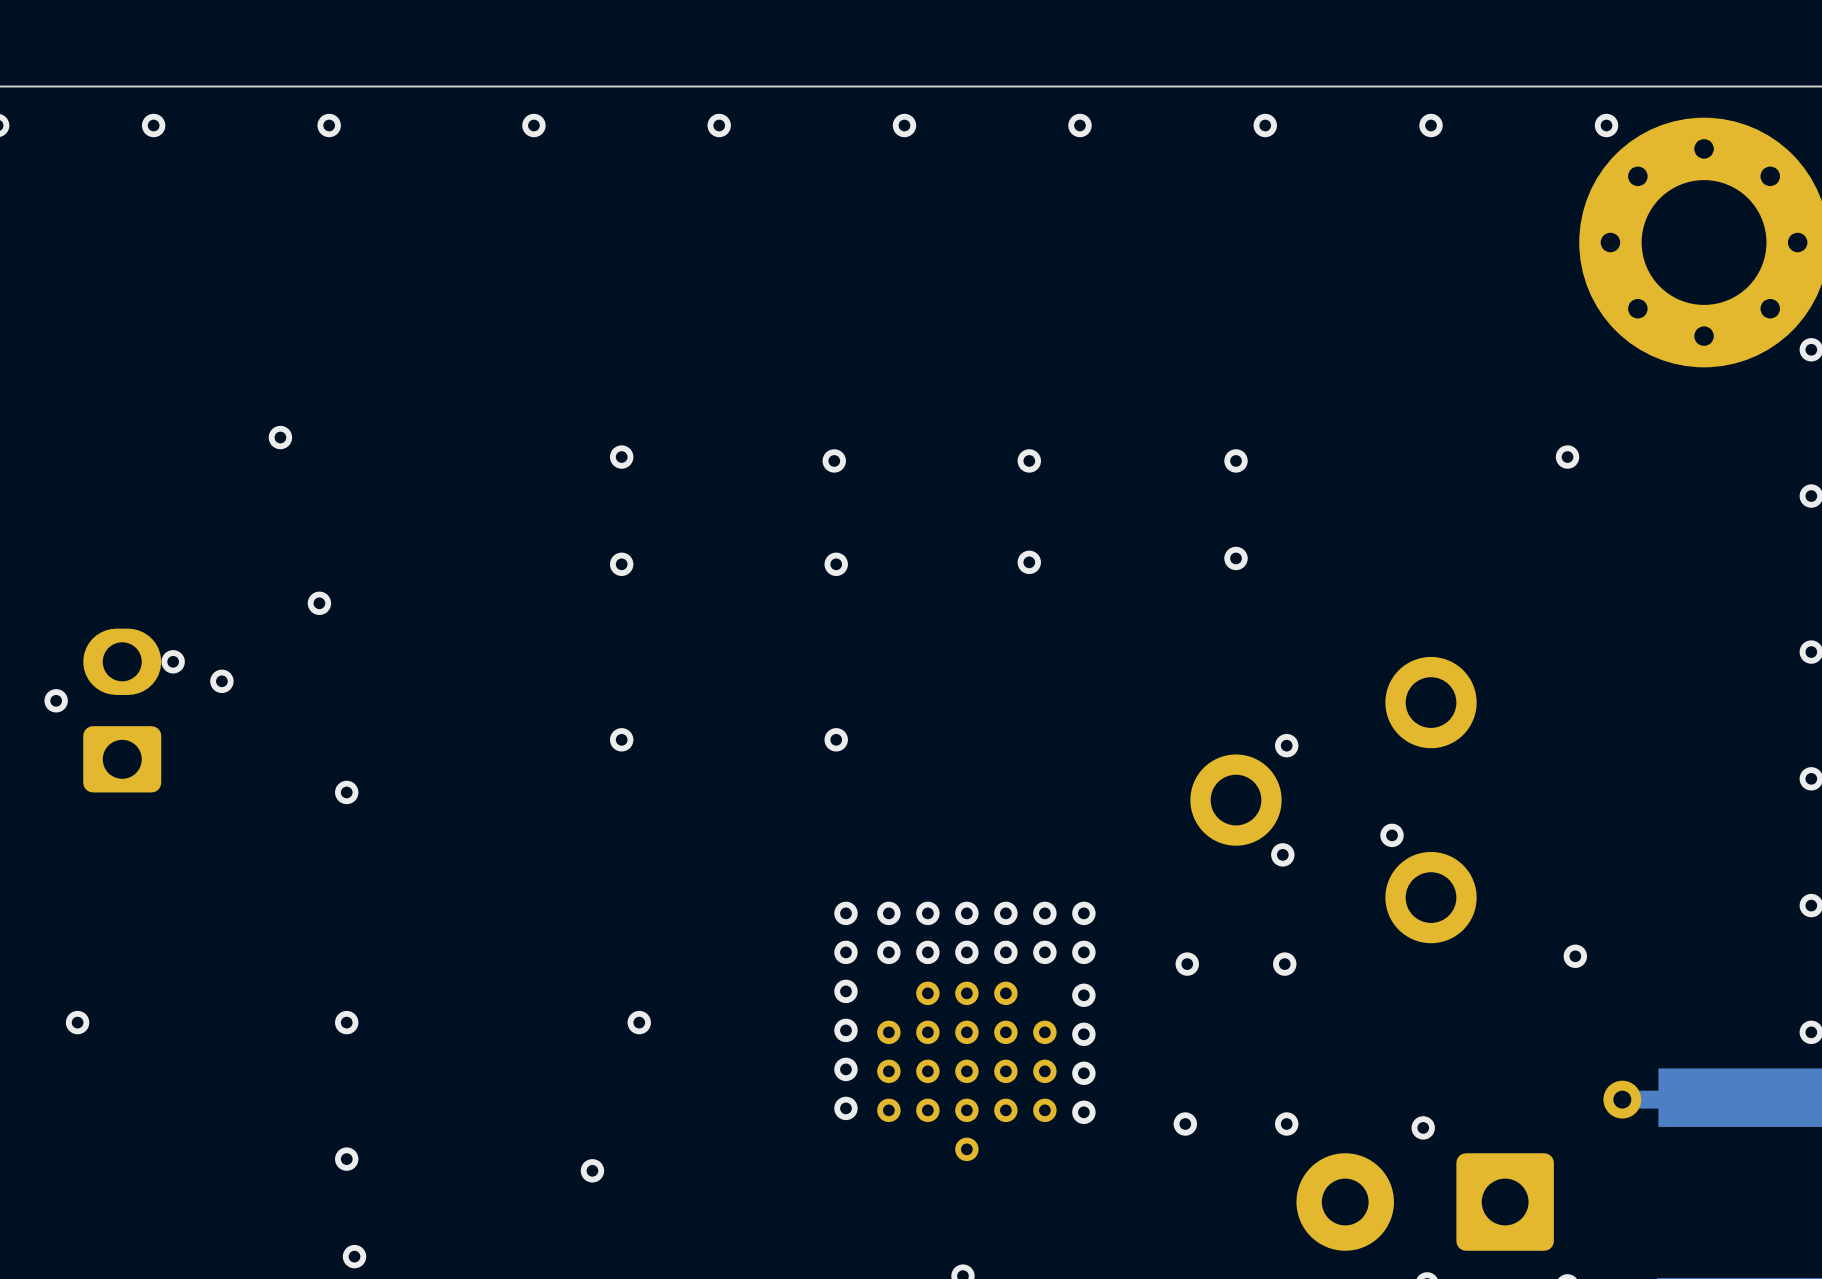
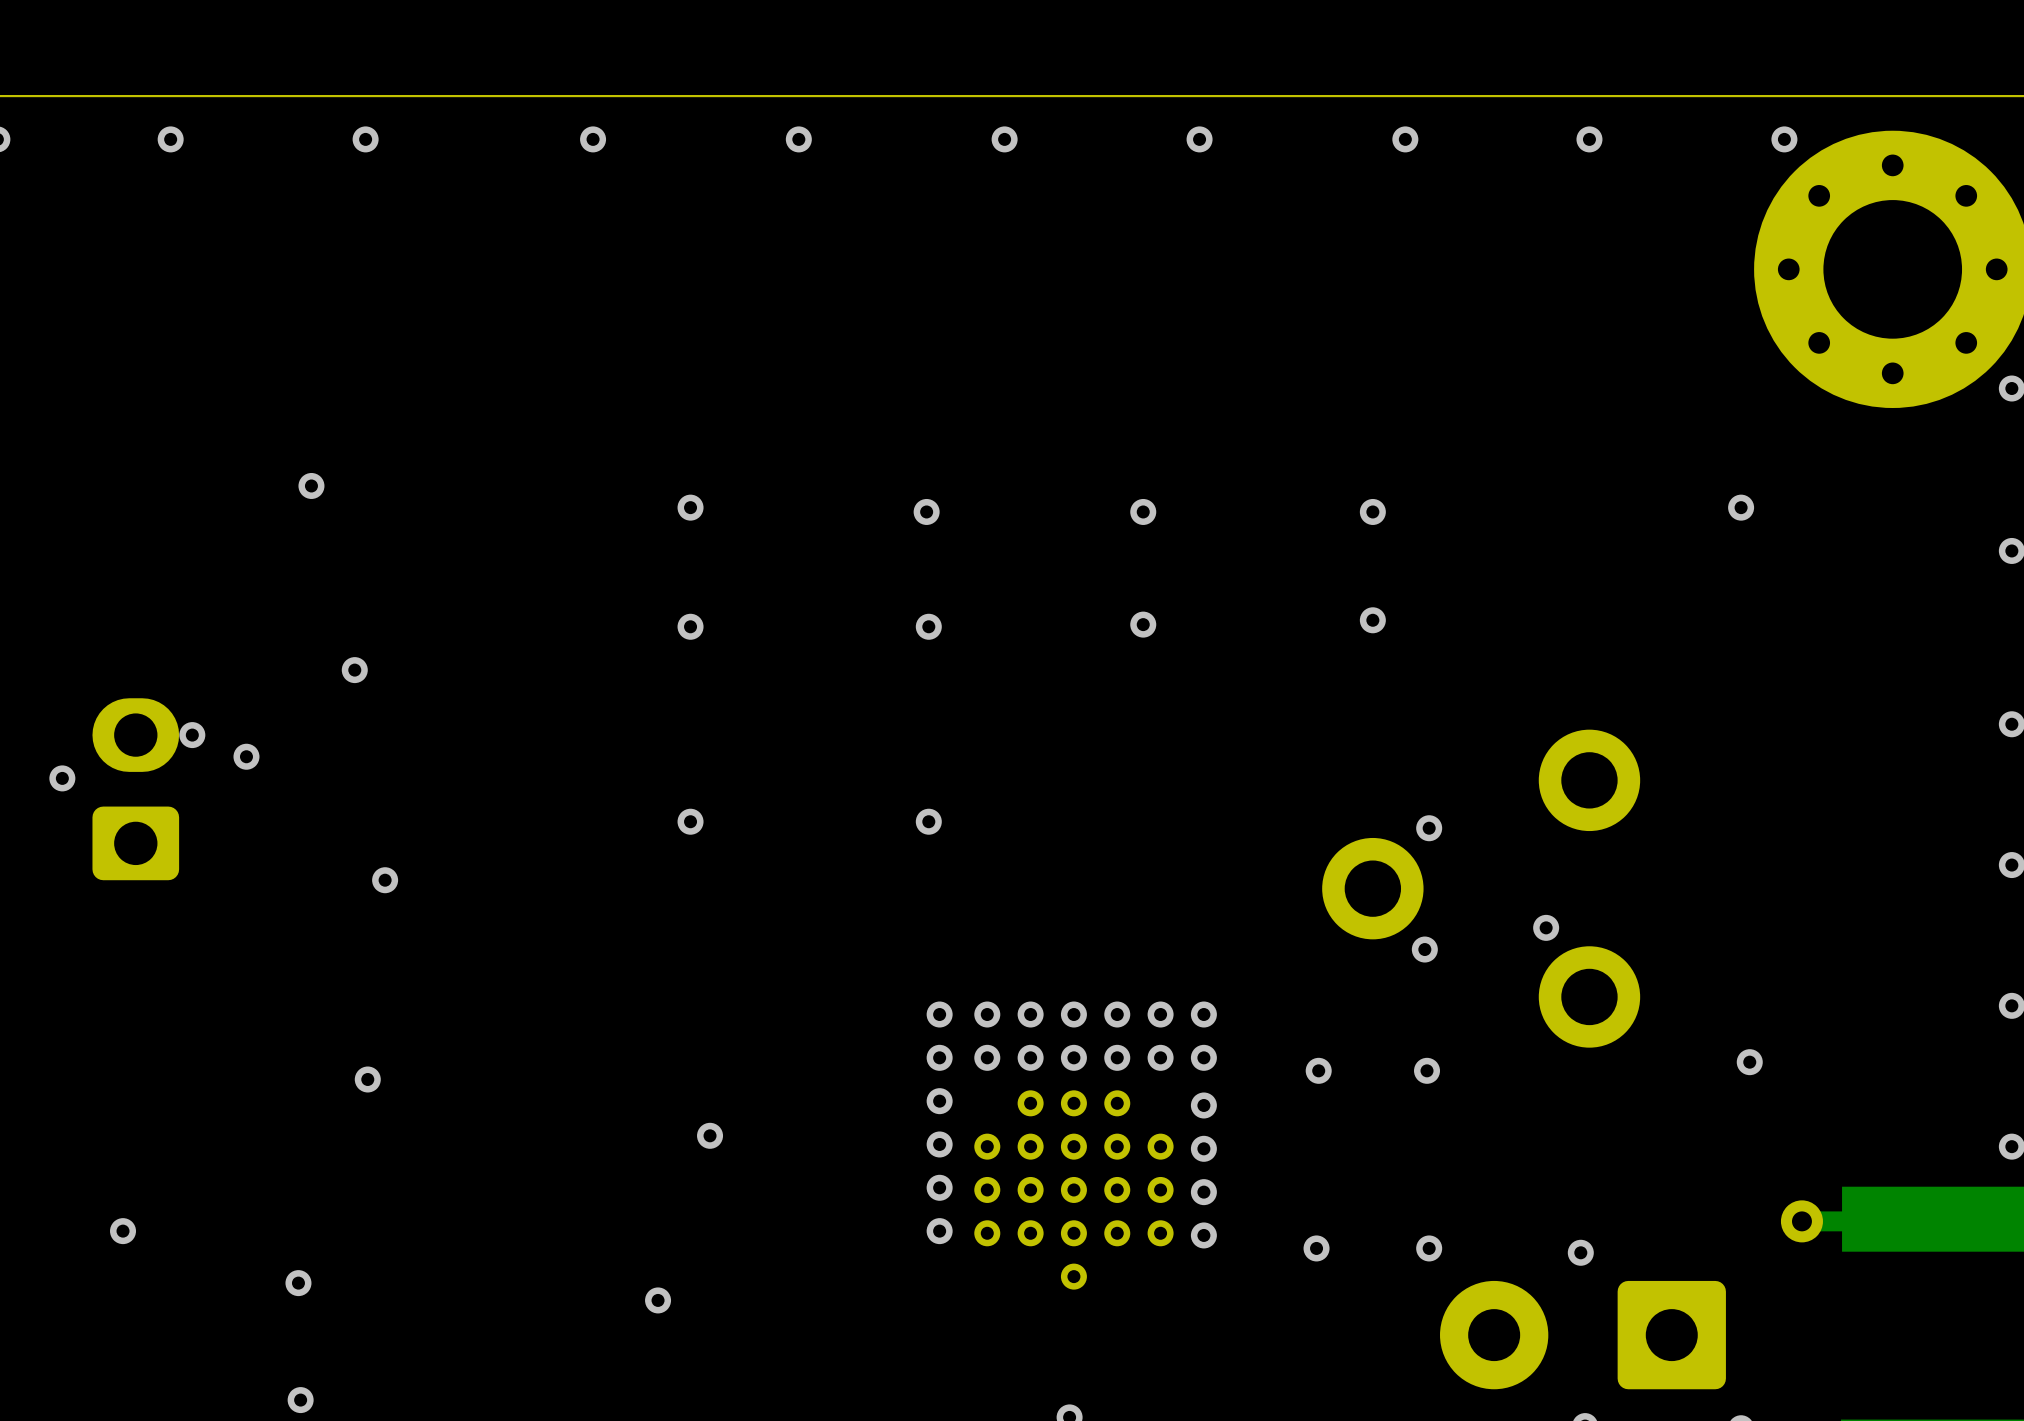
via: (77, 1022) -> none
via position: (346, 1022) -> (367, 1079)
via: none -> (123, 1231)
via: none -> (298, 1283)
via: (346, 1159) -> none
via: (354, 1256) -> none
via: none -> (300, 1400)

